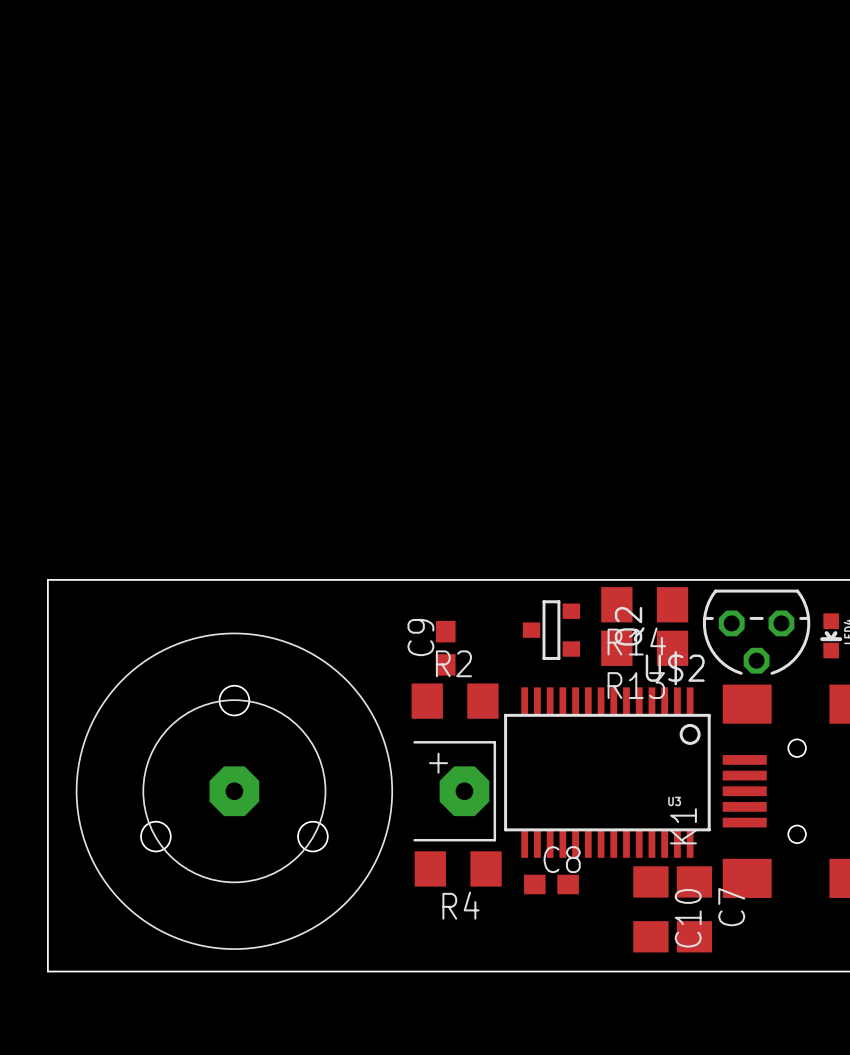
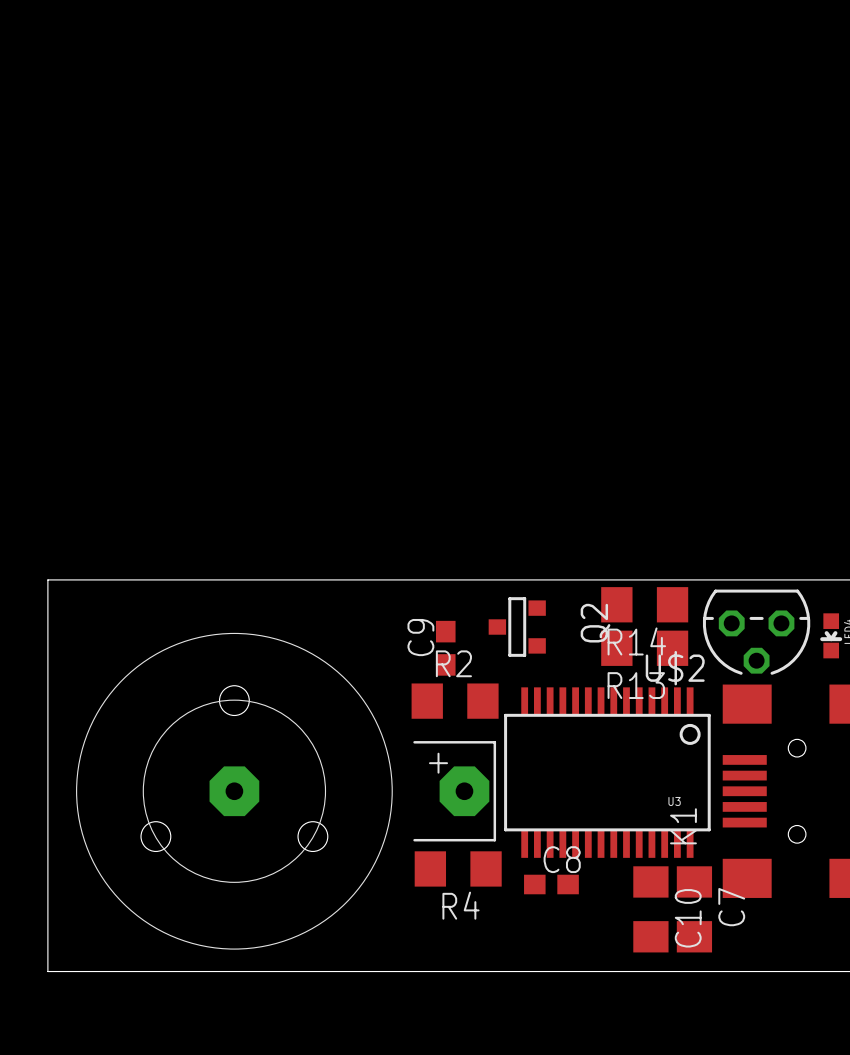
Q2 position: (551, 630) -> (517, 627)

